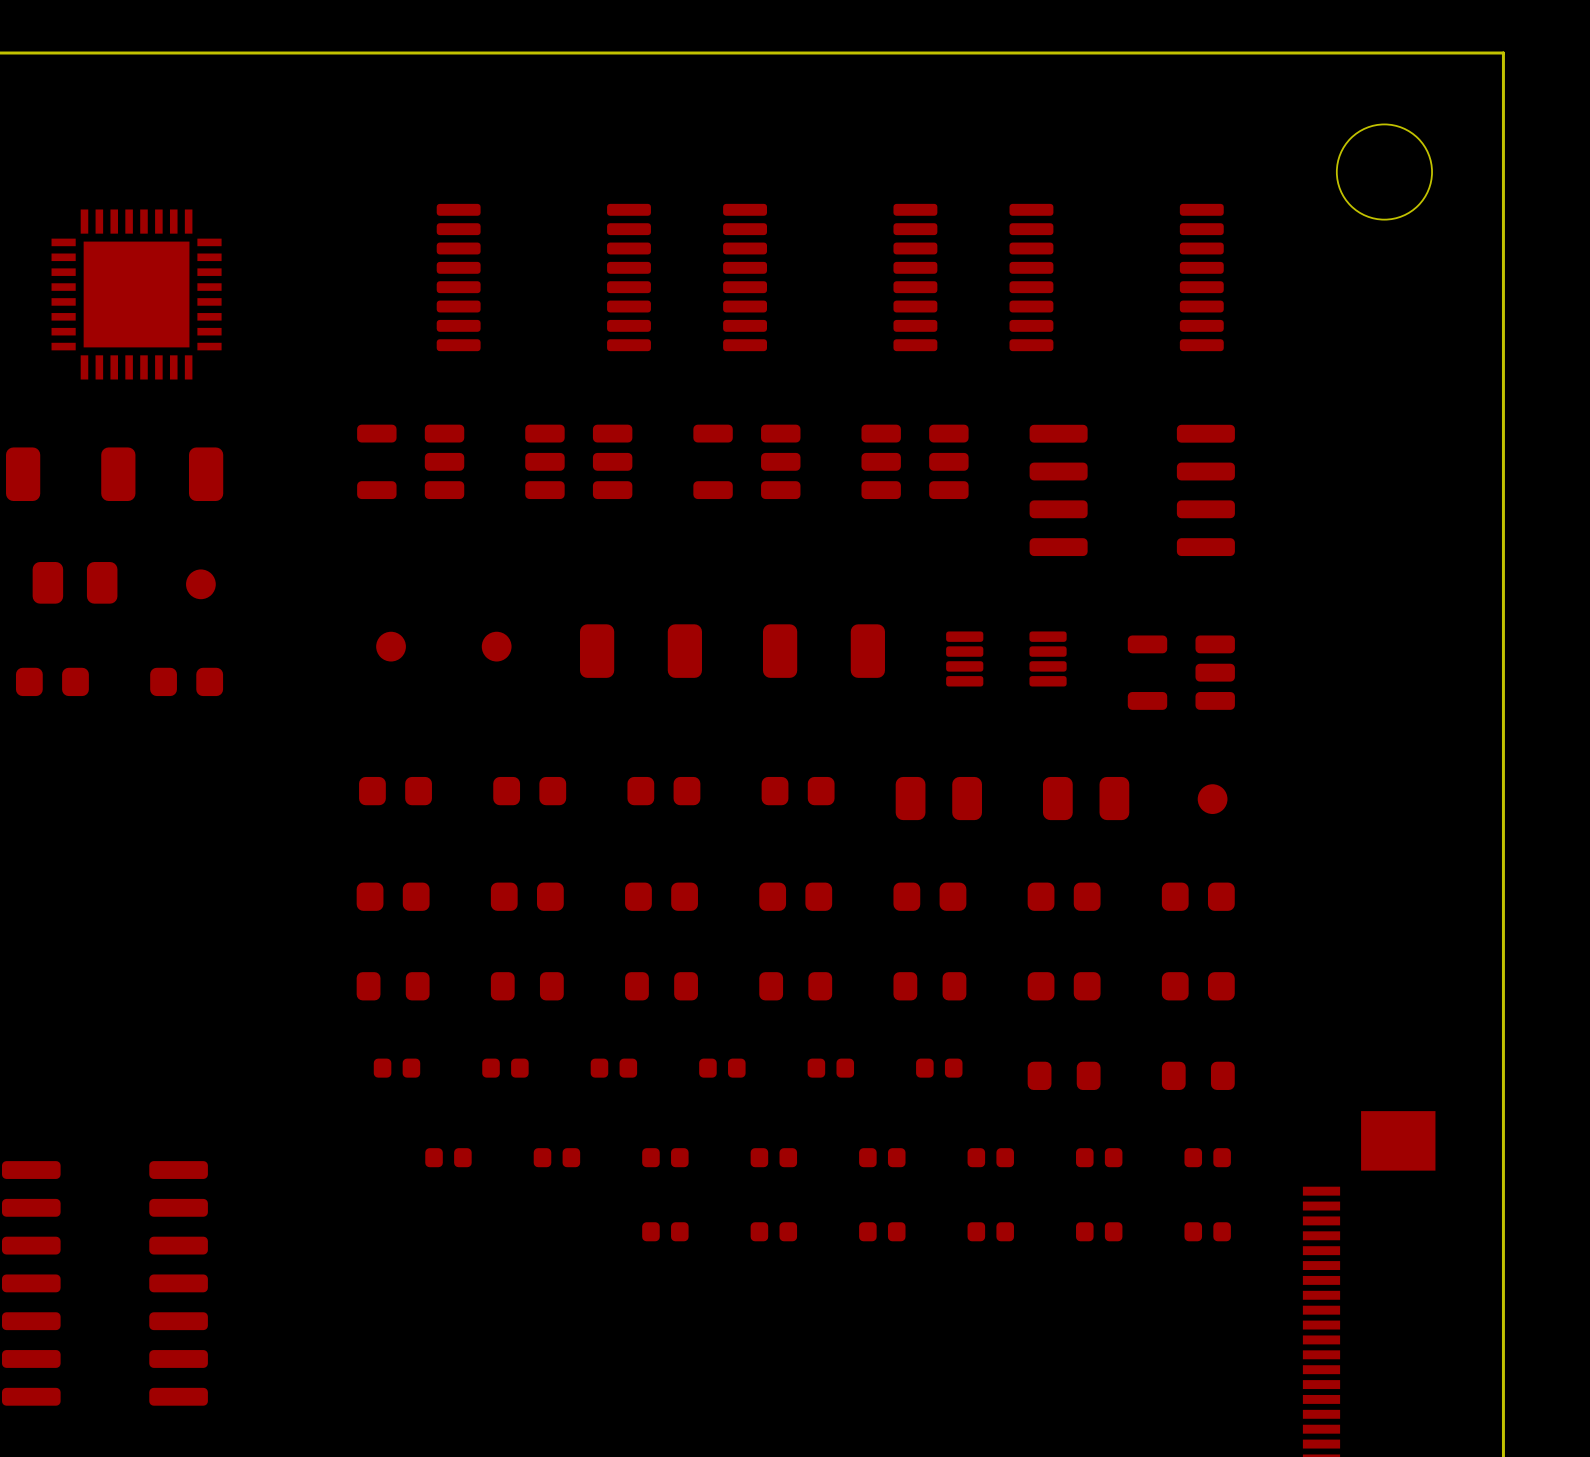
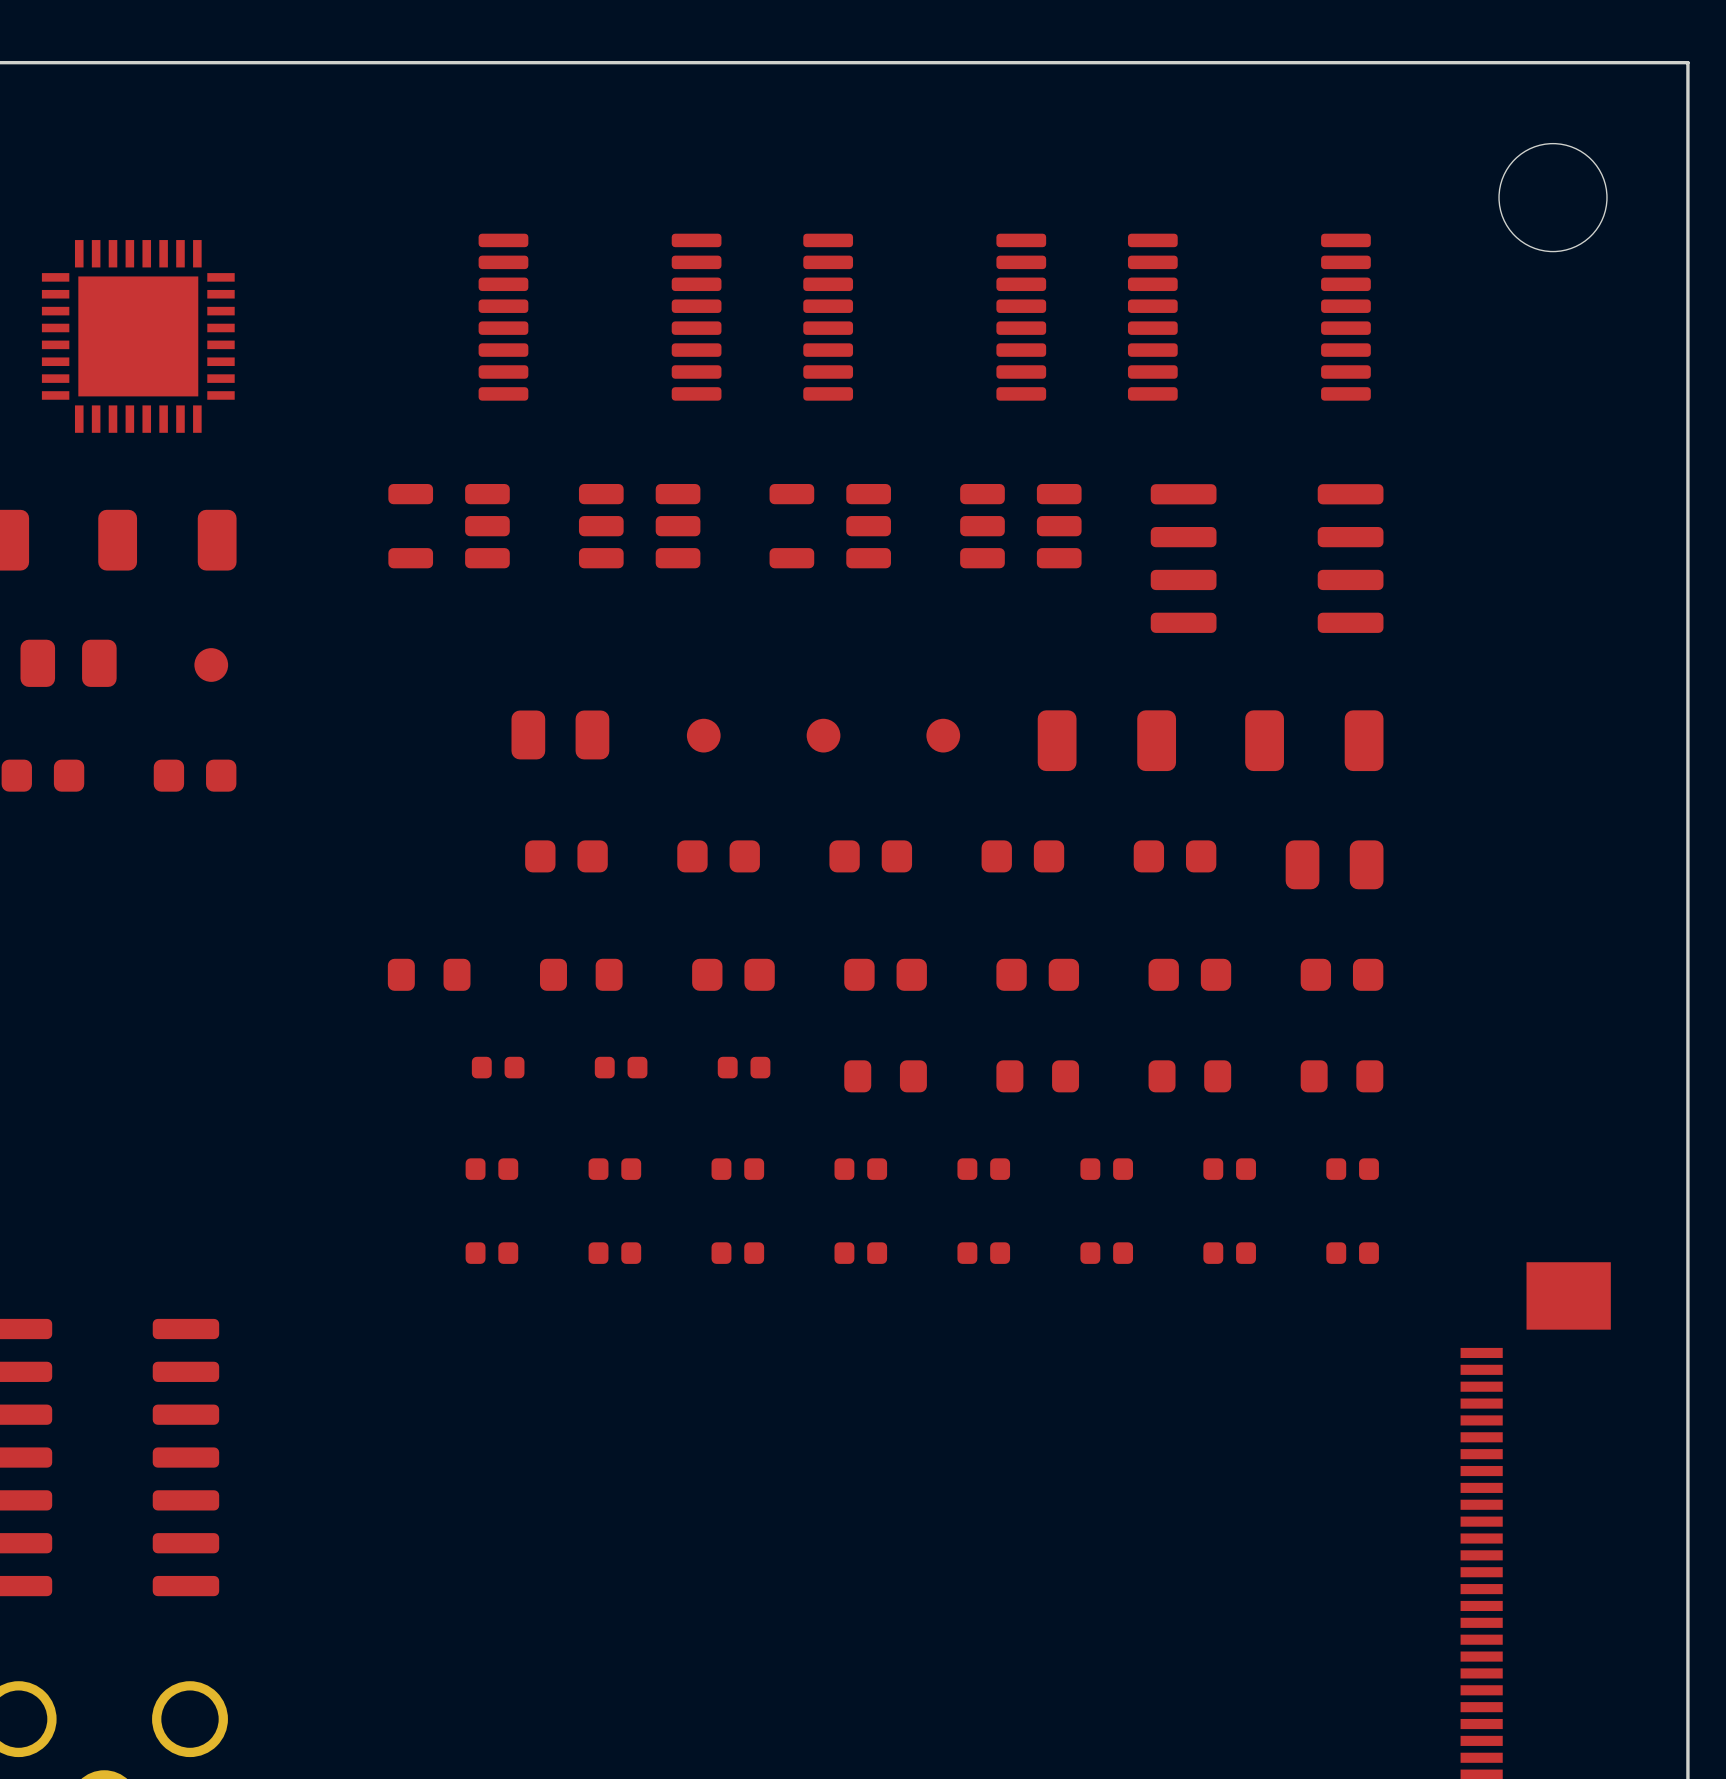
part footprint: [579, 624, 702, 678] -> [686, 718, 721, 753]
part footprint: [762, 624, 885, 678] -> [926, 718, 961, 753]
part footprint: [481, 631, 512, 662] -> [511, 710, 610, 760]
part footprint: [946, 631, 1067, 687] -> [1037, 710, 1177, 772]
part footprint: [1127, 635, 1235, 710] -> [1245, 710, 1384, 772]
part: (391, 646) -> none
part: none -> (823, 735)
part: none -> (718, 856)
part: none -> (870, 856)
part: none -> (1022, 856)
part: none -> (1175, 856)
part: (395, 791) -> none
part position: (529, 791) -> (566, 856)
part: (663, 791) -> none
part: (798, 791) -> none
part: (938, 798) -> none
part position: (1086, 798) -> (1334, 864)
part: (1212, 799) -> none
part: none -> (429, 974)
part: none -> (581, 974)
part: none -> (733, 974)
part: none -> (885, 974)
part: (393, 896) -> none
part: (527, 896) -> none
part: (661, 896) -> none
part: (795, 896) -> none
part position: (929, 896) -> (1037, 974)
part position: (1064, 896) -> (1189, 974)
part position: (1198, 896) -> (1342, 974)
part: none -> (498, 1067)
part: none -> (621, 1067)
part: none -> (744, 1067)
part: none -> (1189, 1076)
part: none -> (1342, 1076)
part: (393, 986) -> none
part: (527, 986) -> none
part: (661, 986) -> none
part position: (795, 986) -> (885, 1076)
part position: (929, 986) -> (1037, 1076)
part: (1064, 986) -> none
part: (1198, 986) -> none
part: none -> (491, 1169)
part: none -> (614, 1169)
part: none -> (737, 1169)
part: none -> (860, 1169)
part: none -> (983, 1169)
part: none -> (1106, 1169)
part: none -> (1229, 1169)
part: none -> (1352, 1169)
part: (396, 1068) -> none
part: (505, 1068) -> none
part: (613, 1068) -> none
part: (722, 1068) -> none
part: (830, 1068) -> none
part: (939, 1068) -> none
part: (1064, 1075) -> none
part: (1198, 1075) -> none
part: none -> (491, 1253)
part: none -> (614, 1253)
part: none -> (737, 1253)
part: none -> (860, 1253)
part: none -> (983, 1253)
part: none -> (1106, 1253)
part: (448, 1157) -> none
part: (556, 1157) -> none
part: (665, 1157) -> none
part: (773, 1157) -> none
part: (882, 1157) -> none
part: (990, 1157) -> none
part position: (1099, 1157) -> (1229, 1253)
part position: (1207, 1157) -> (1352, 1253)
part: (665, 1231) -> none
part: (773, 1231) -> none
part: (882, 1231) -> none
part: (990, 1231) -> none
part: (1099, 1231) -> none
part: (1207, 1231) -> none

